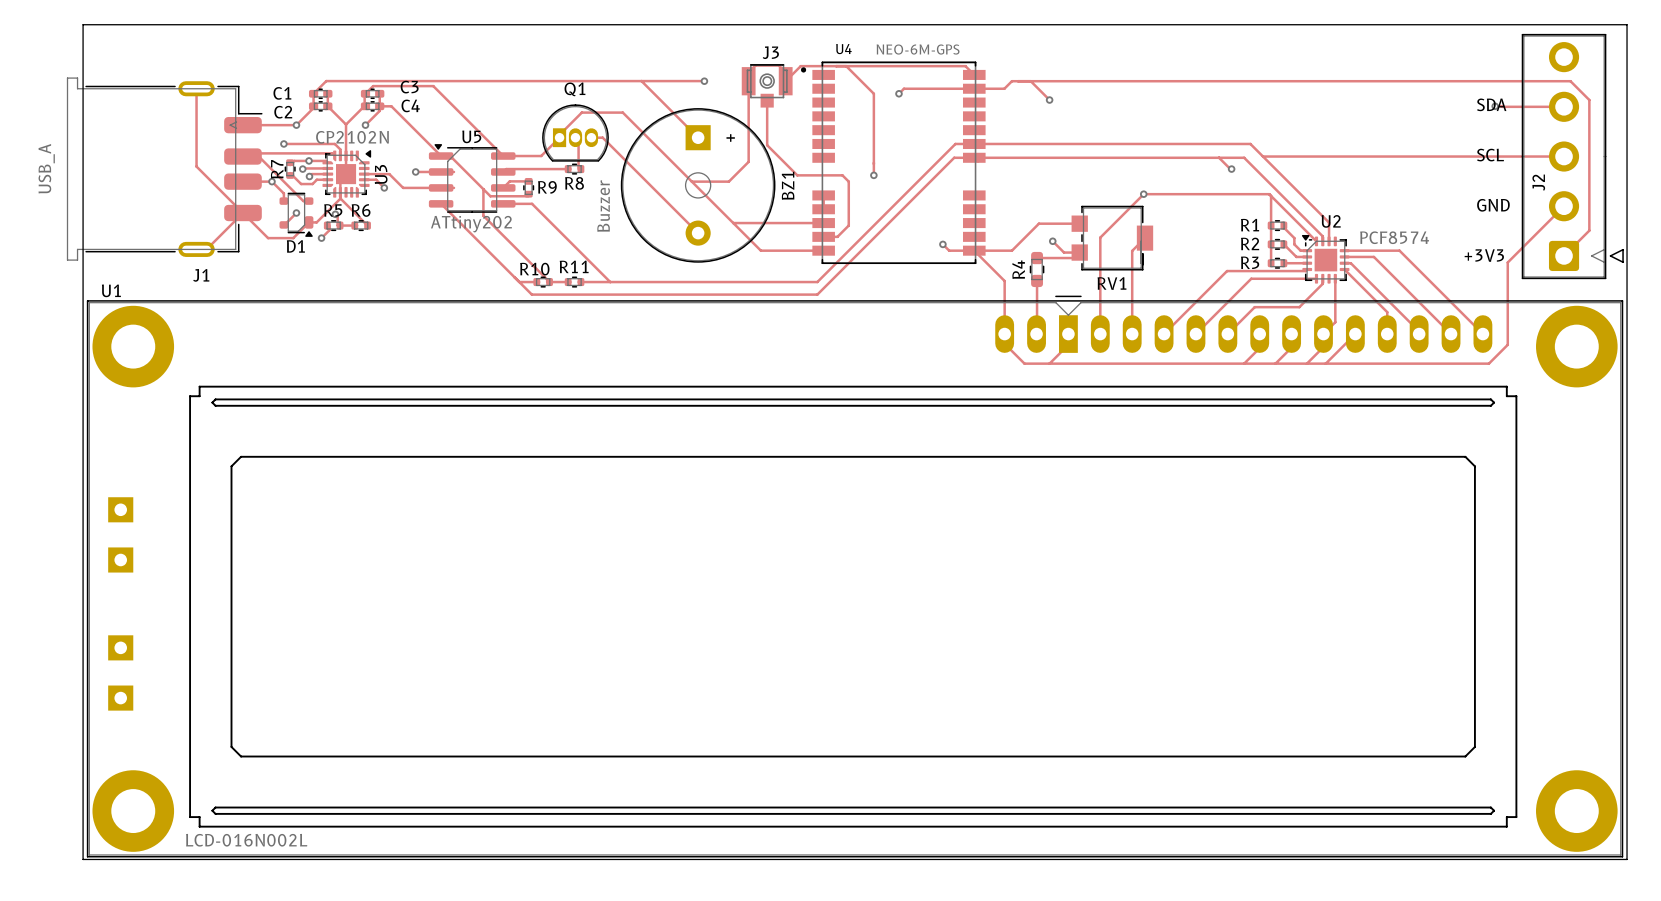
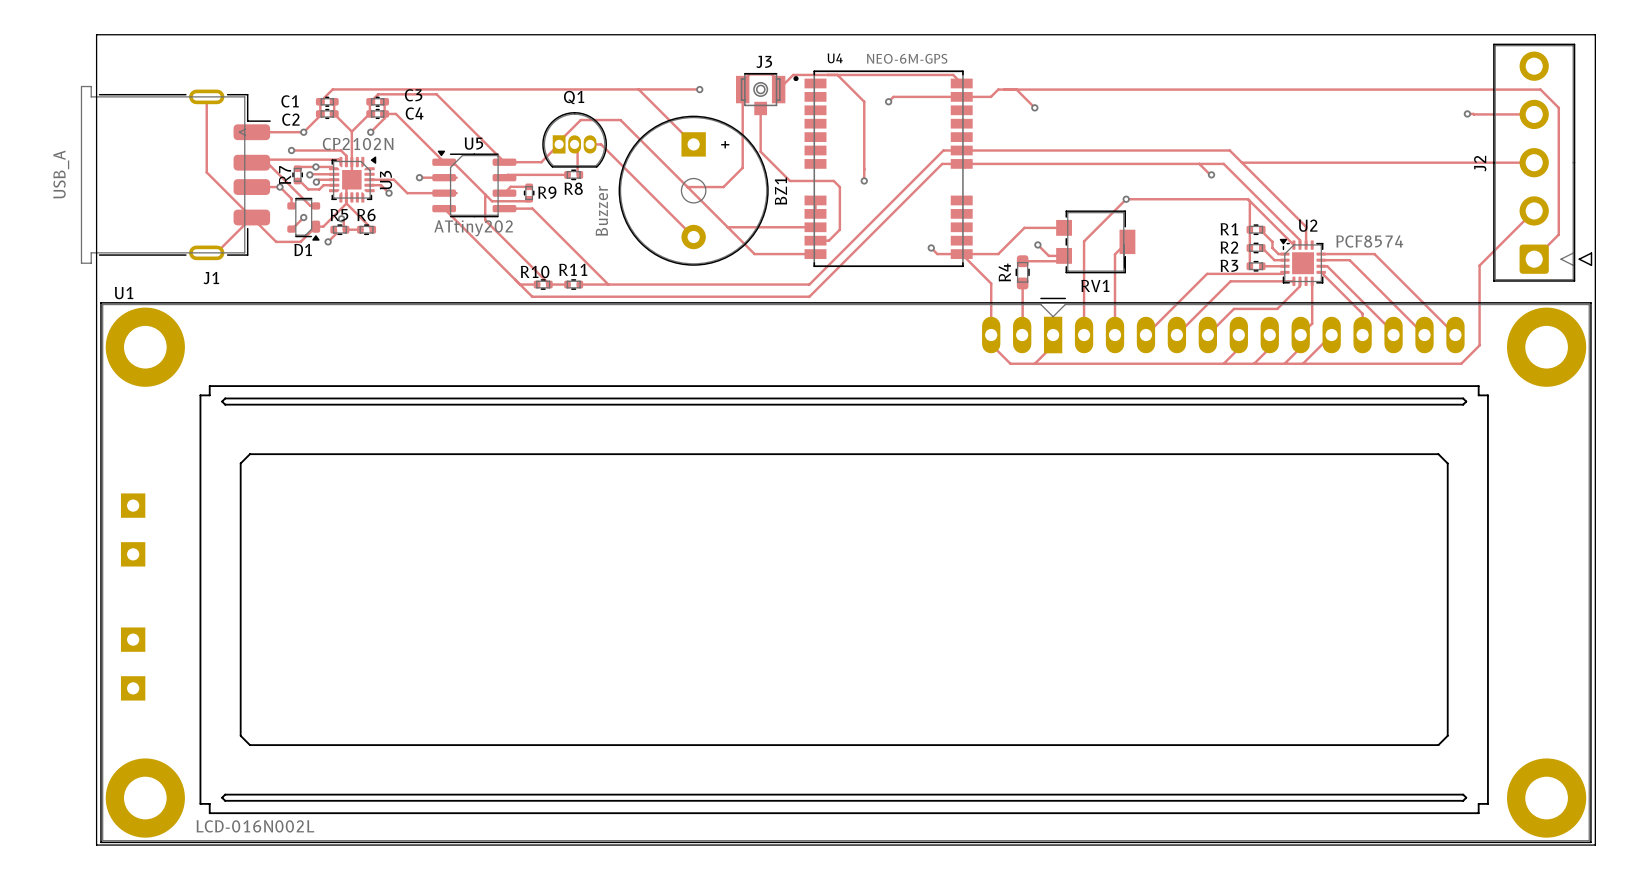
text: SDA (1491, 104) -> none
text: SCL (1490, 155) -> none
J2 name position: J2 (1538, 182) -> J2 (1480, 163)
text: GND (1493, 205) -> none
text: +3V3 (1484, 255) -> none

